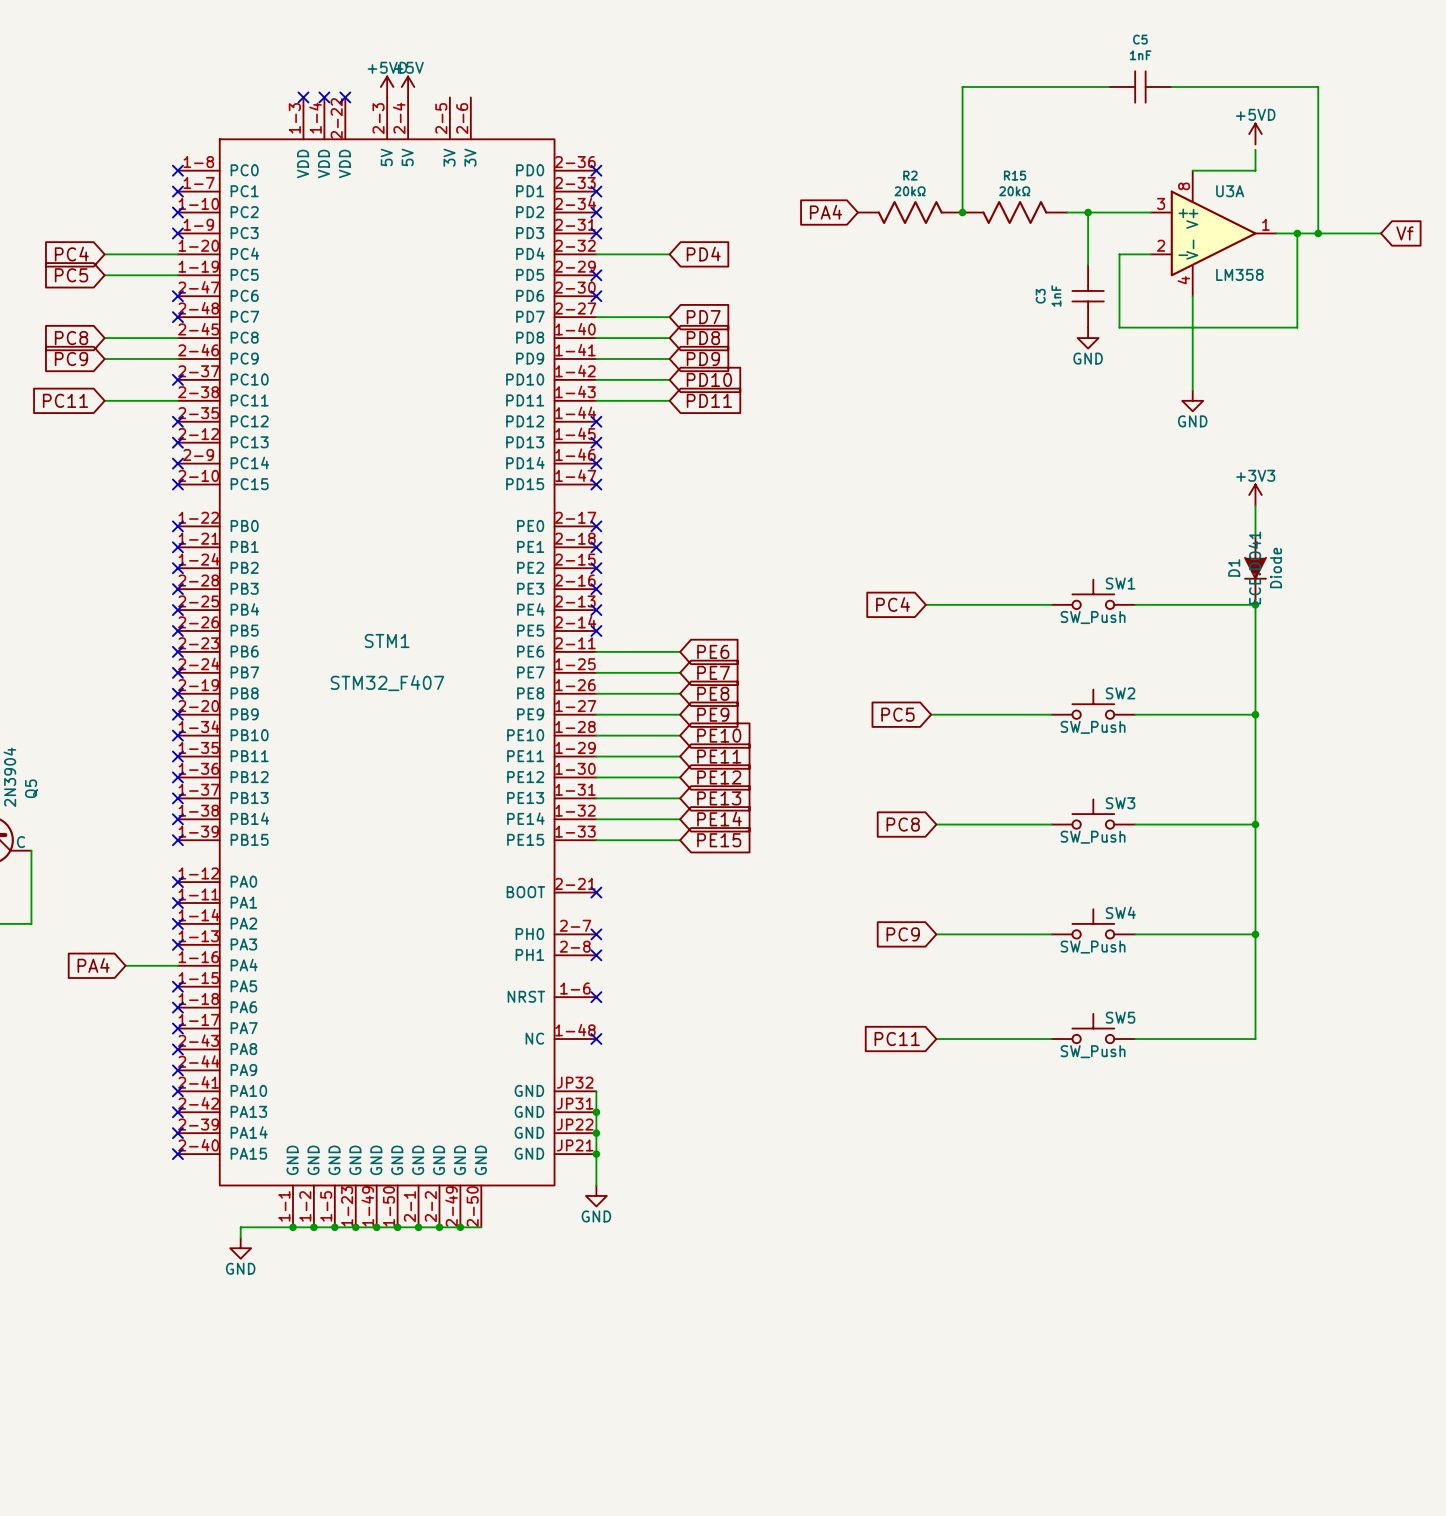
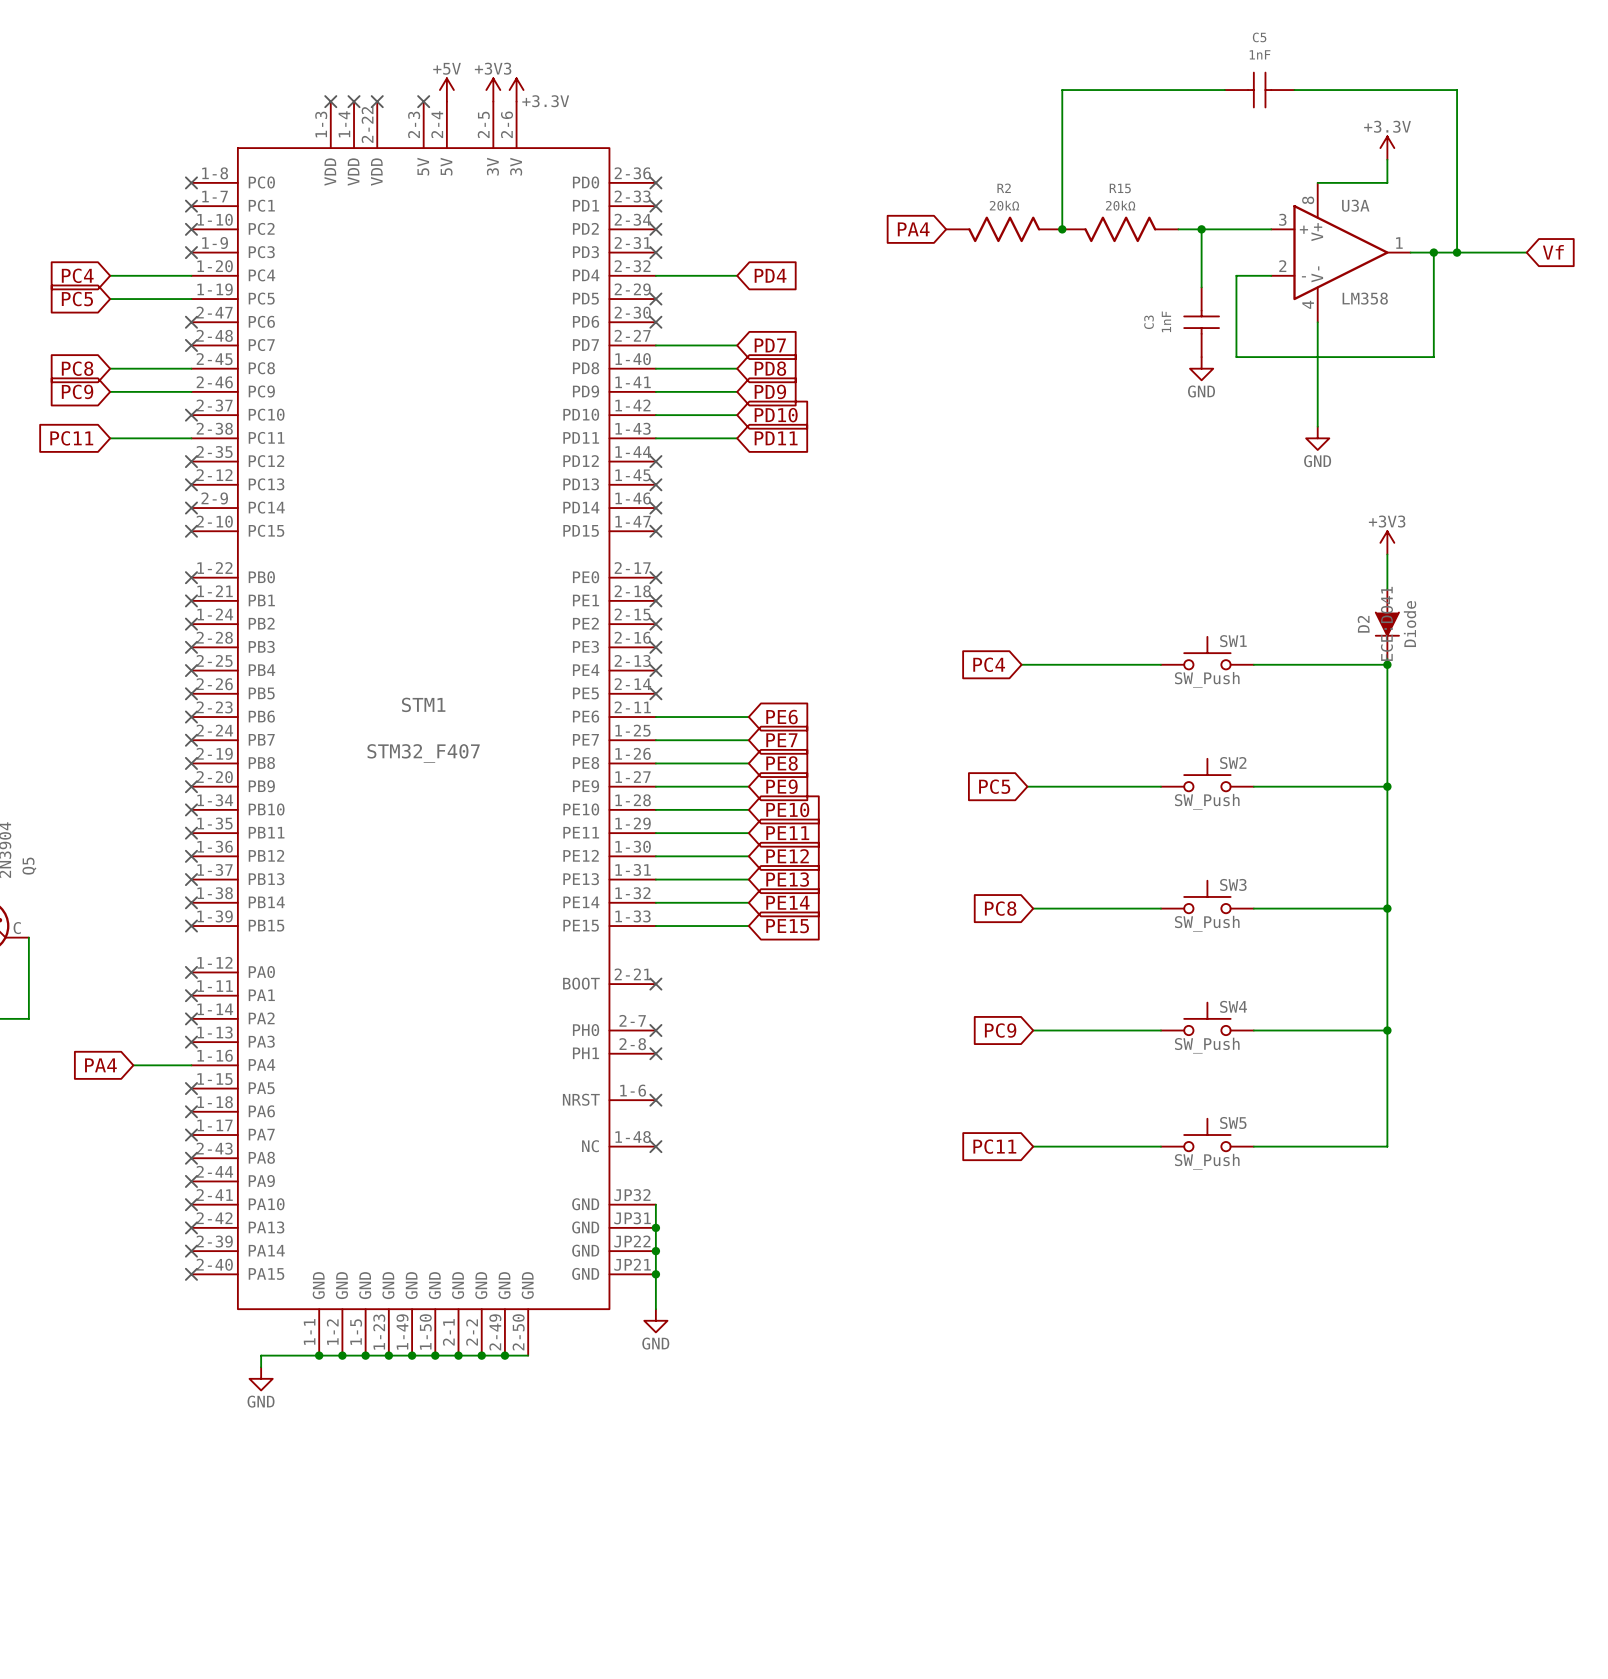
power symbol: +5VD (387, 86) -> none
power symbol: none -> +3V3 (493, 90)
power symbol: none -> +3.3V (516, 90)
no-connect mark: none -> (423, 101)
power symbol: +5VD (1255, 134) -> +3.3V (1387, 148)
D1 name: D1 (1234, 567) -> D2 (1363, 624)

